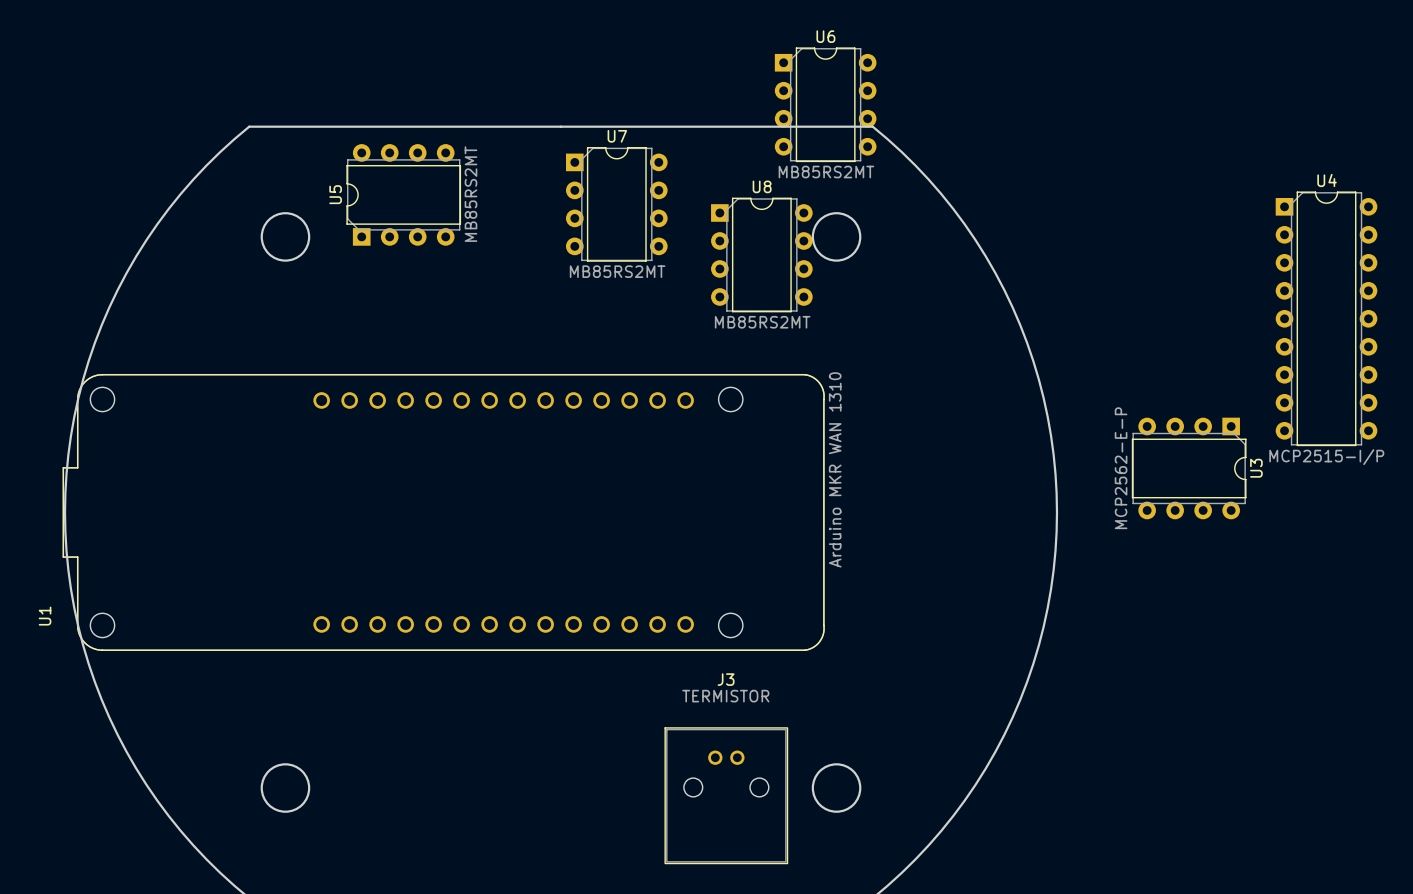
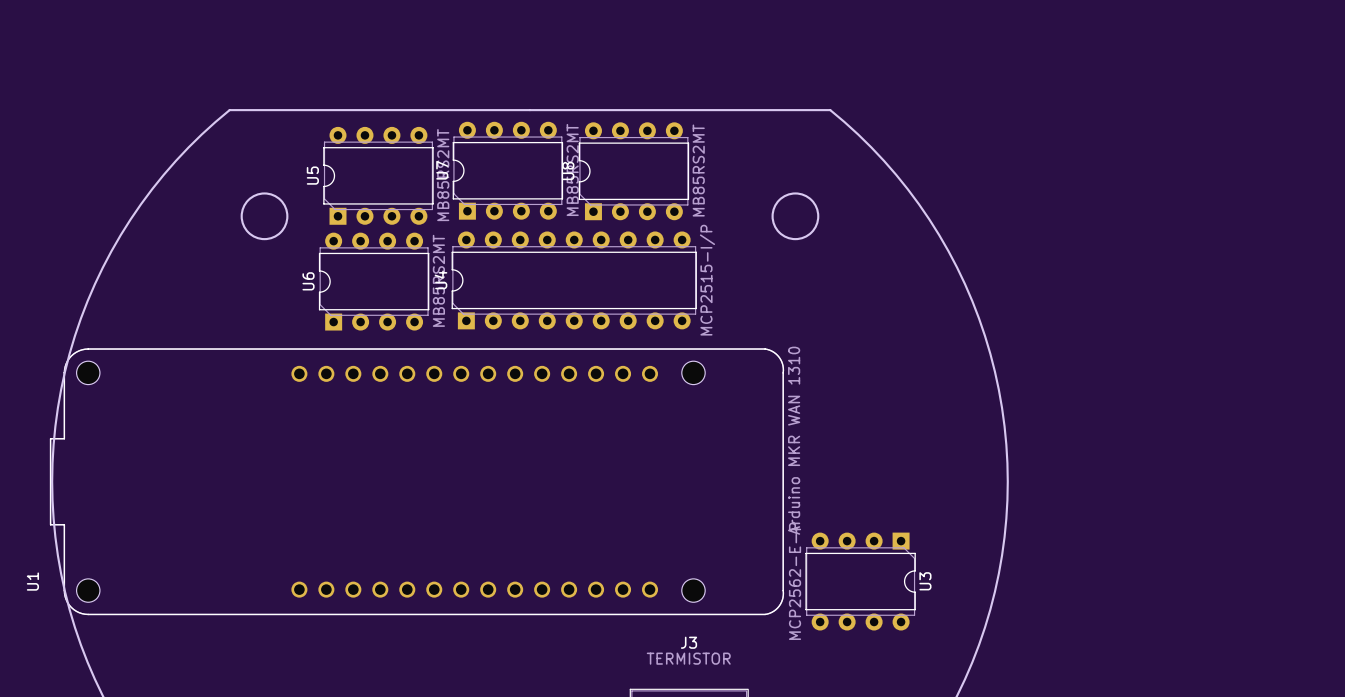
U6 rotation: 0° (825, 104) -> 90° counterclockwise (374, 281)
U6 position: (825, 104) -> (374, 281)
U7 rotation: 0° (616, 204) -> 90° counterclockwise (507, 170)
U7 position: (616, 204) -> (507, 170)
U8 rotation: 0° (761, 254) -> 90° counterclockwise (633, 171)
U8 position: (761, 254) -> (633, 171)
U4 rotation: 0° (1326, 318) -> 90° counterclockwise (574, 280)
U4 position: (1326, 318) -> (574, 280)
U3 position: (1189, 468) -> (860, 581)

